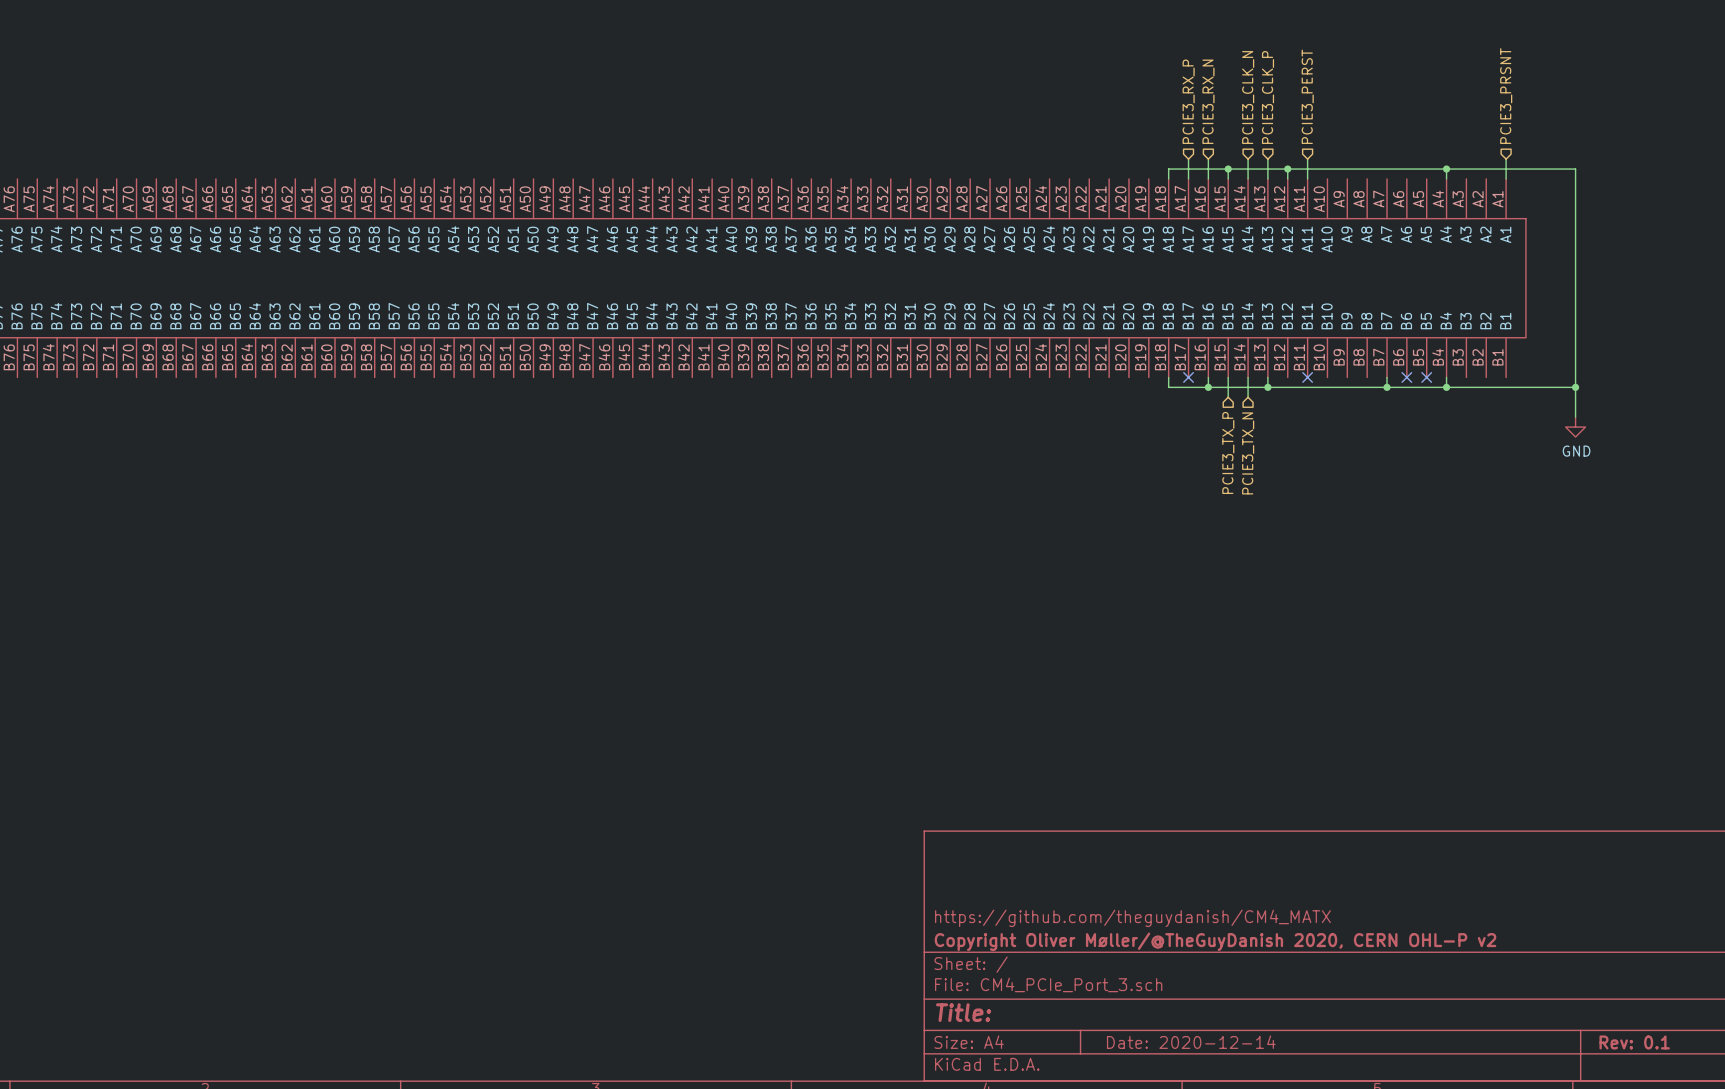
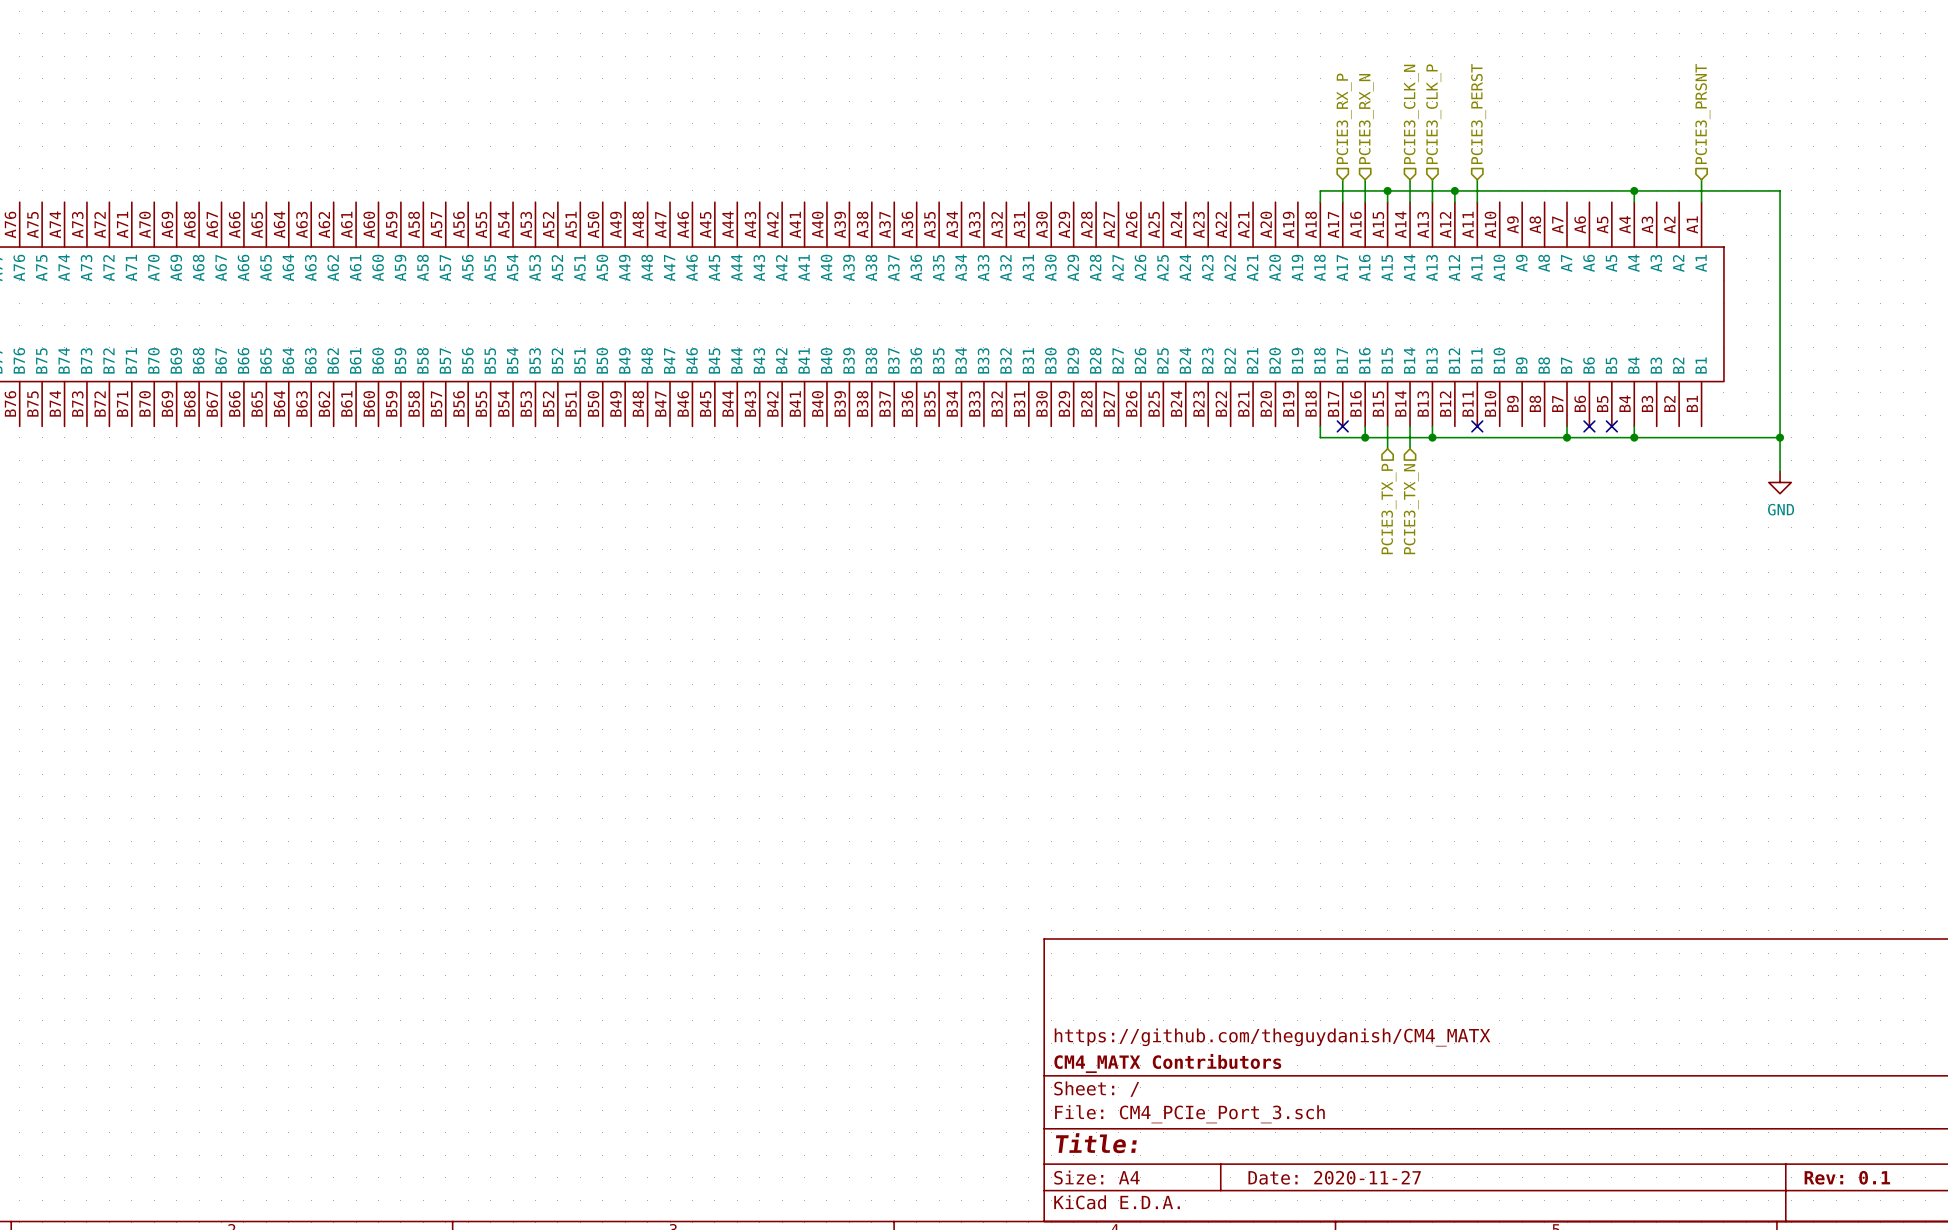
title block: Copyright Oliver Møller/@TheGuyDanish 2020, CERN OHL-P v2 (1215, 941) -> CM4_MATX Contributors (1167, 1063)
title block: Date: 2020-12-14 (1191, 1042) -> Date: 2020-11-27 (1334, 1177)

